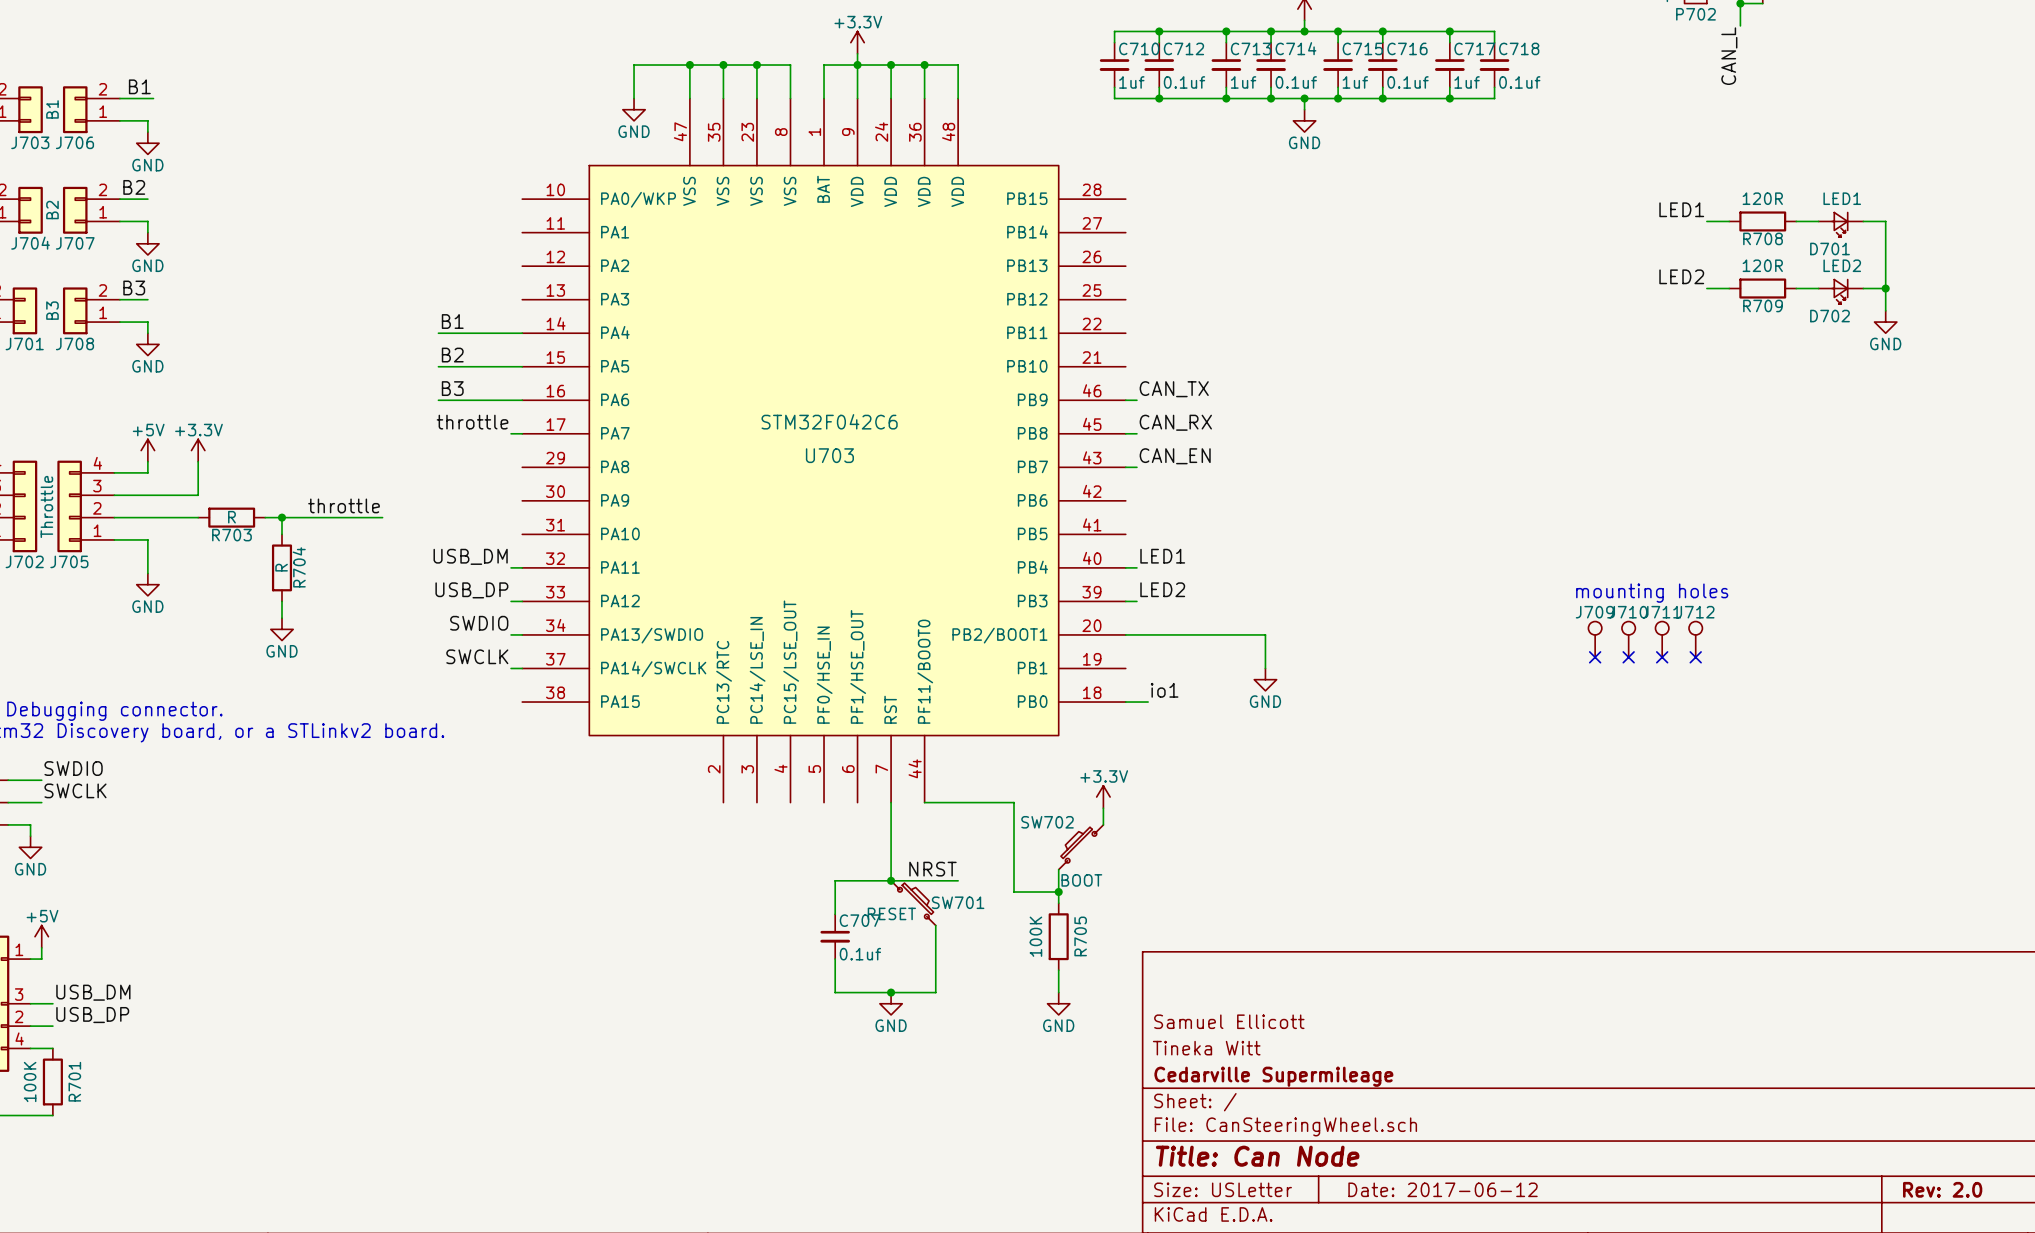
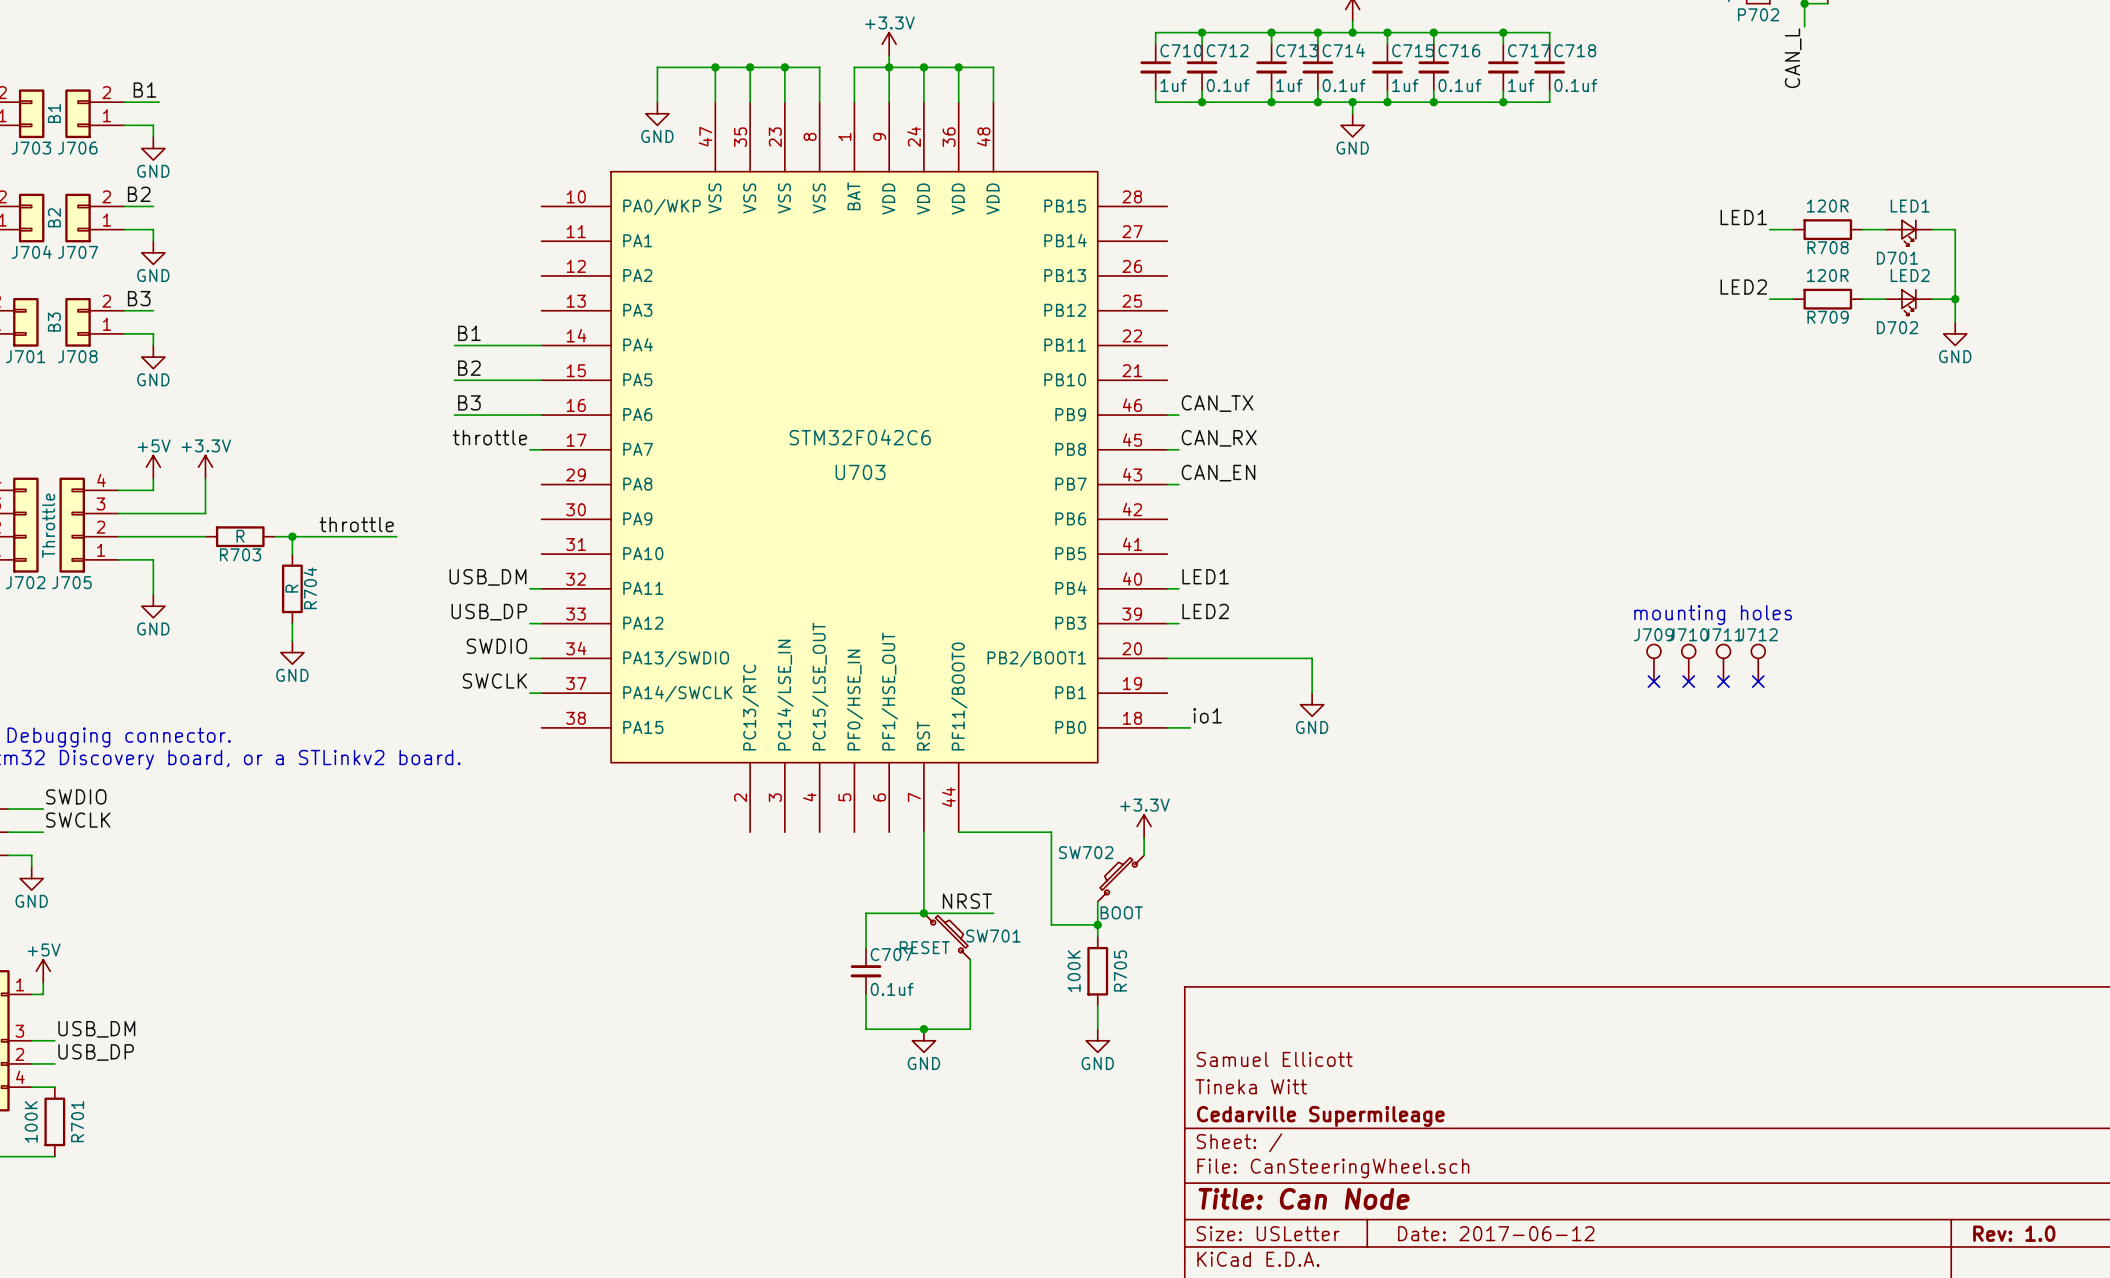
title block: Rev: 2.0 (1942, 1189) -> Rev: 1.0 (2014, 1233)

